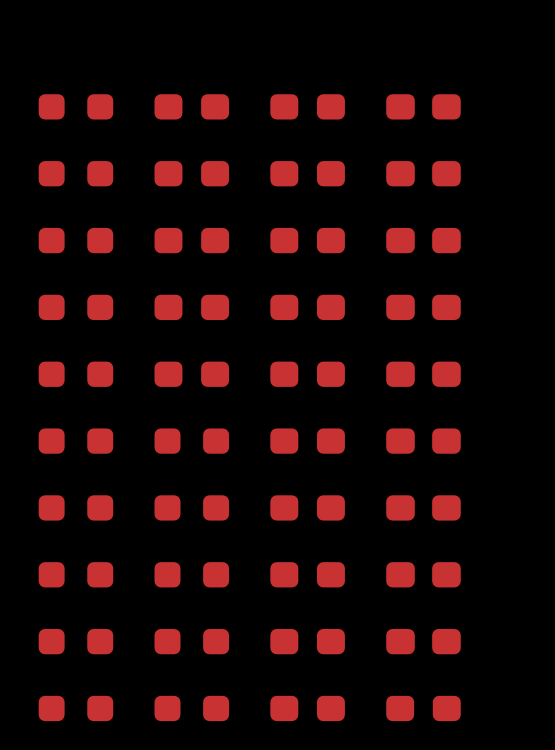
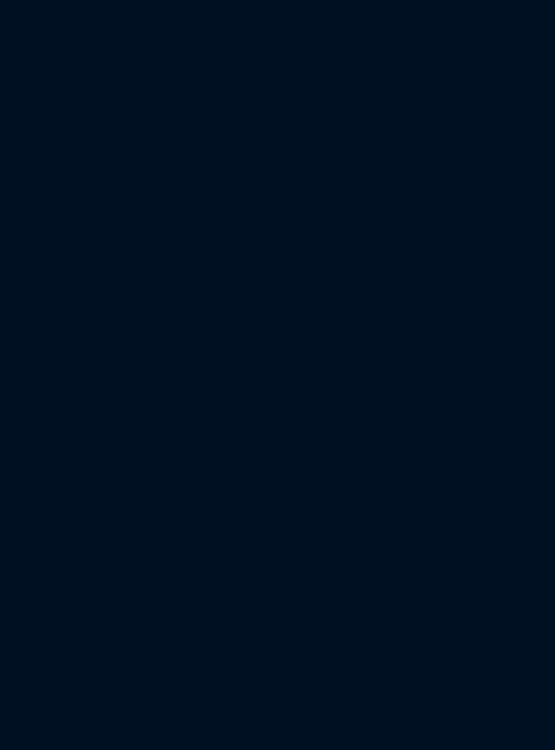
part: (75, 106) -> none
part: (191, 106) -> none
part: (307, 106) -> none
part: (423, 106) -> none
part: (75, 173) -> none
part: (191, 173) -> none
part: (307, 173) -> none
part: (423, 173) -> none
part: (75, 240) -> none
part: (191, 240) -> none
part: (307, 240) -> none
part: (423, 240) -> none
part: (75, 307) -> none
part: (191, 307) -> none
part: (307, 307) -> none
part: (423, 307) -> none
part: (75, 374) -> none
part: (191, 374) -> none
part: (307, 374) -> none
part: (423, 374) -> none
part: (75, 441) -> none
part: (191, 441) -> none
part: (307, 441) -> none
part: (423, 441) -> none
part: (75, 507) -> none
part: (191, 507) -> none
part: (307, 507) -> none
part: (423, 507) -> none
part: (75, 574) -> none
part: (191, 574) -> none
part: (307, 574) -> none
part: (423, 574) -> none
part: (75, 641) -> none
part: (191, 641) -> none
part: (307, 641) -> none
part: (423, 641) -> none
part: (75, 708) -> none
part: (191, 708) -> none
part: (307, 708) -> none
part: (423, 708) -> none

